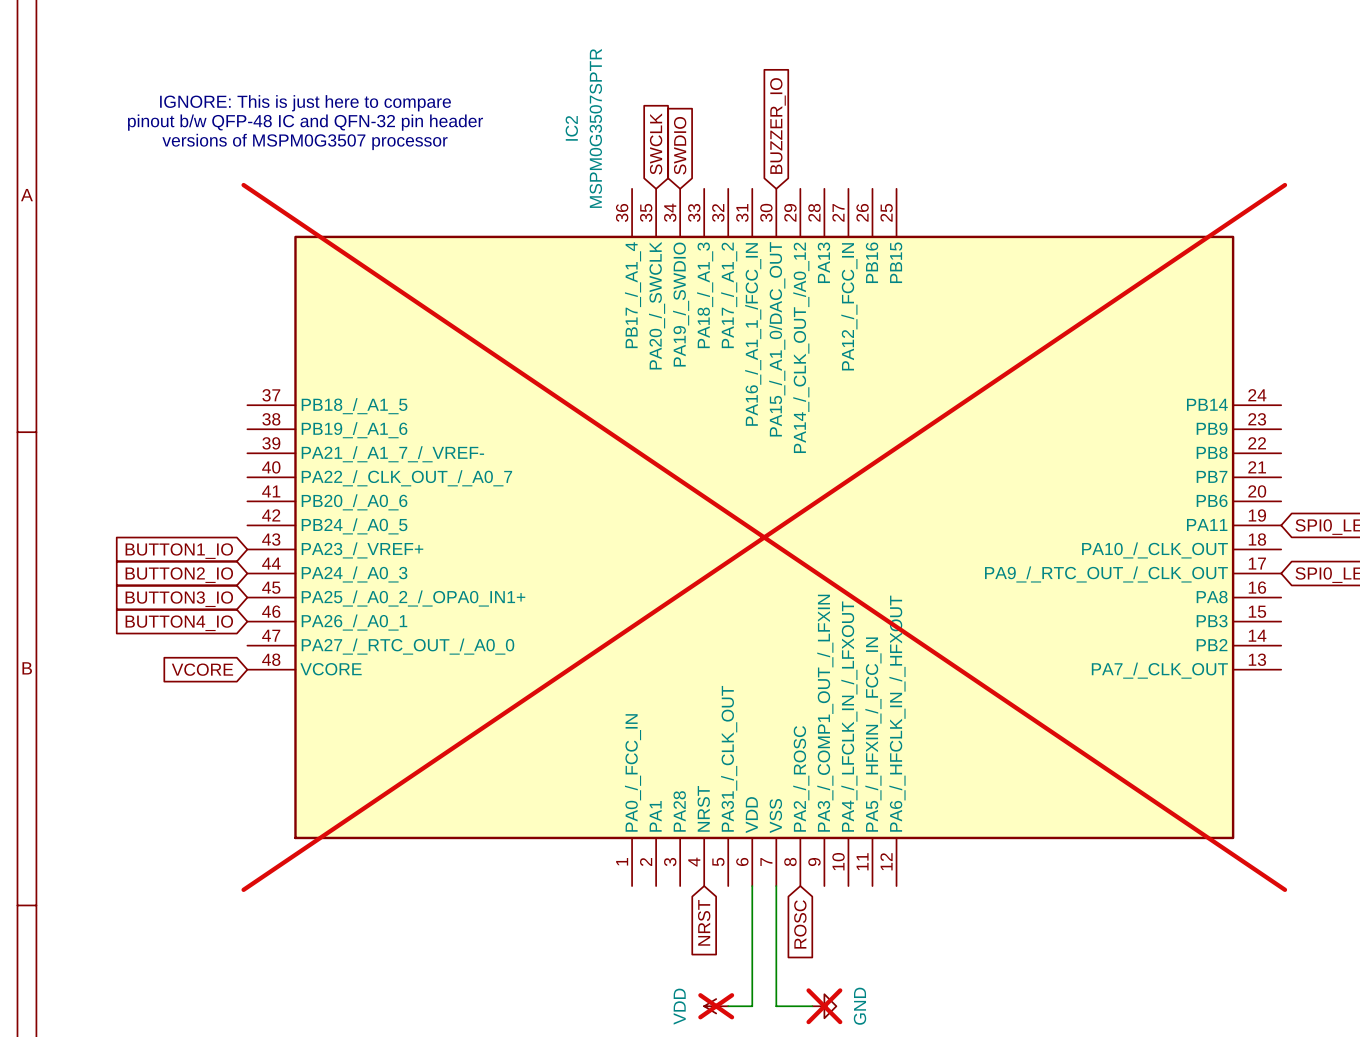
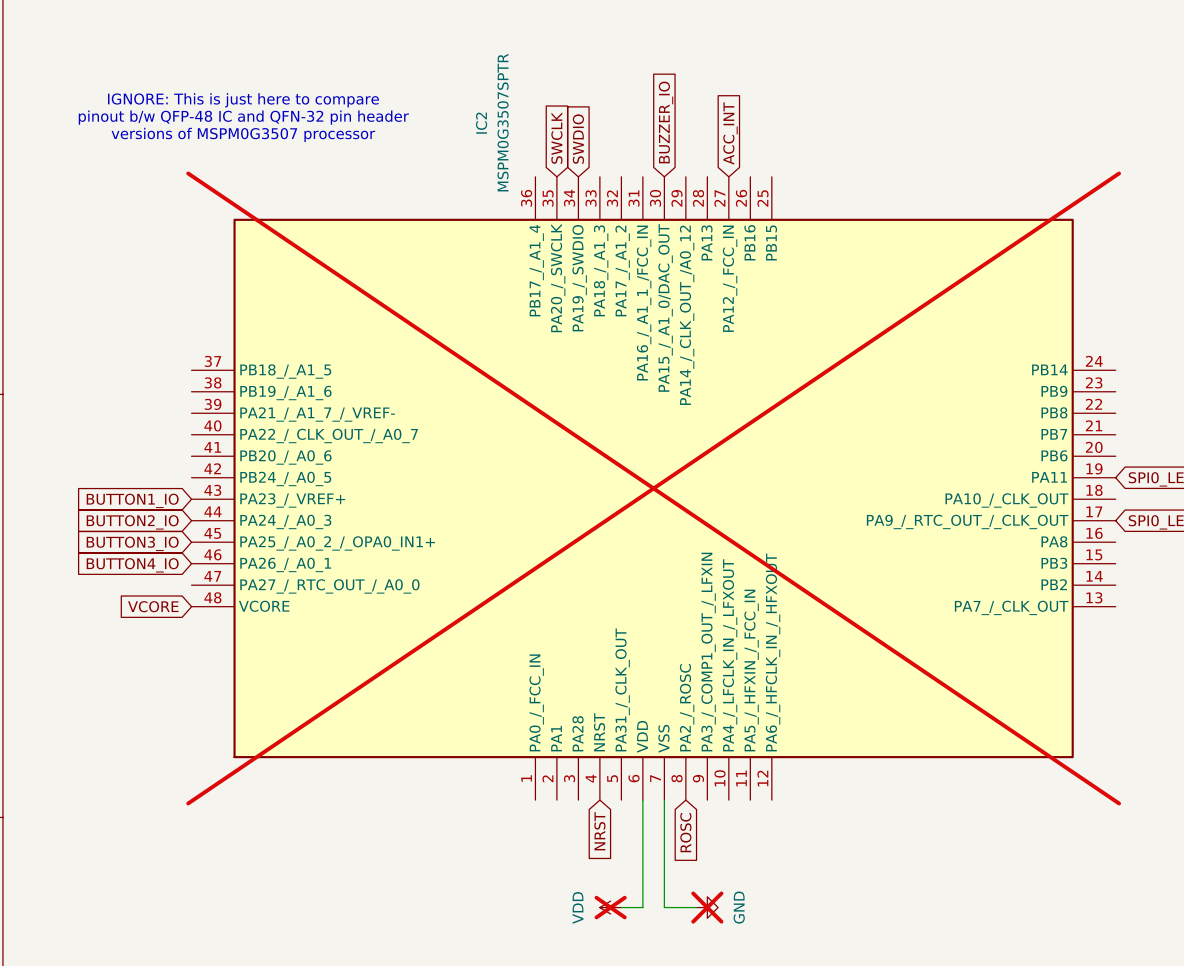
global label: none -> ACC_INT (730, 133)

